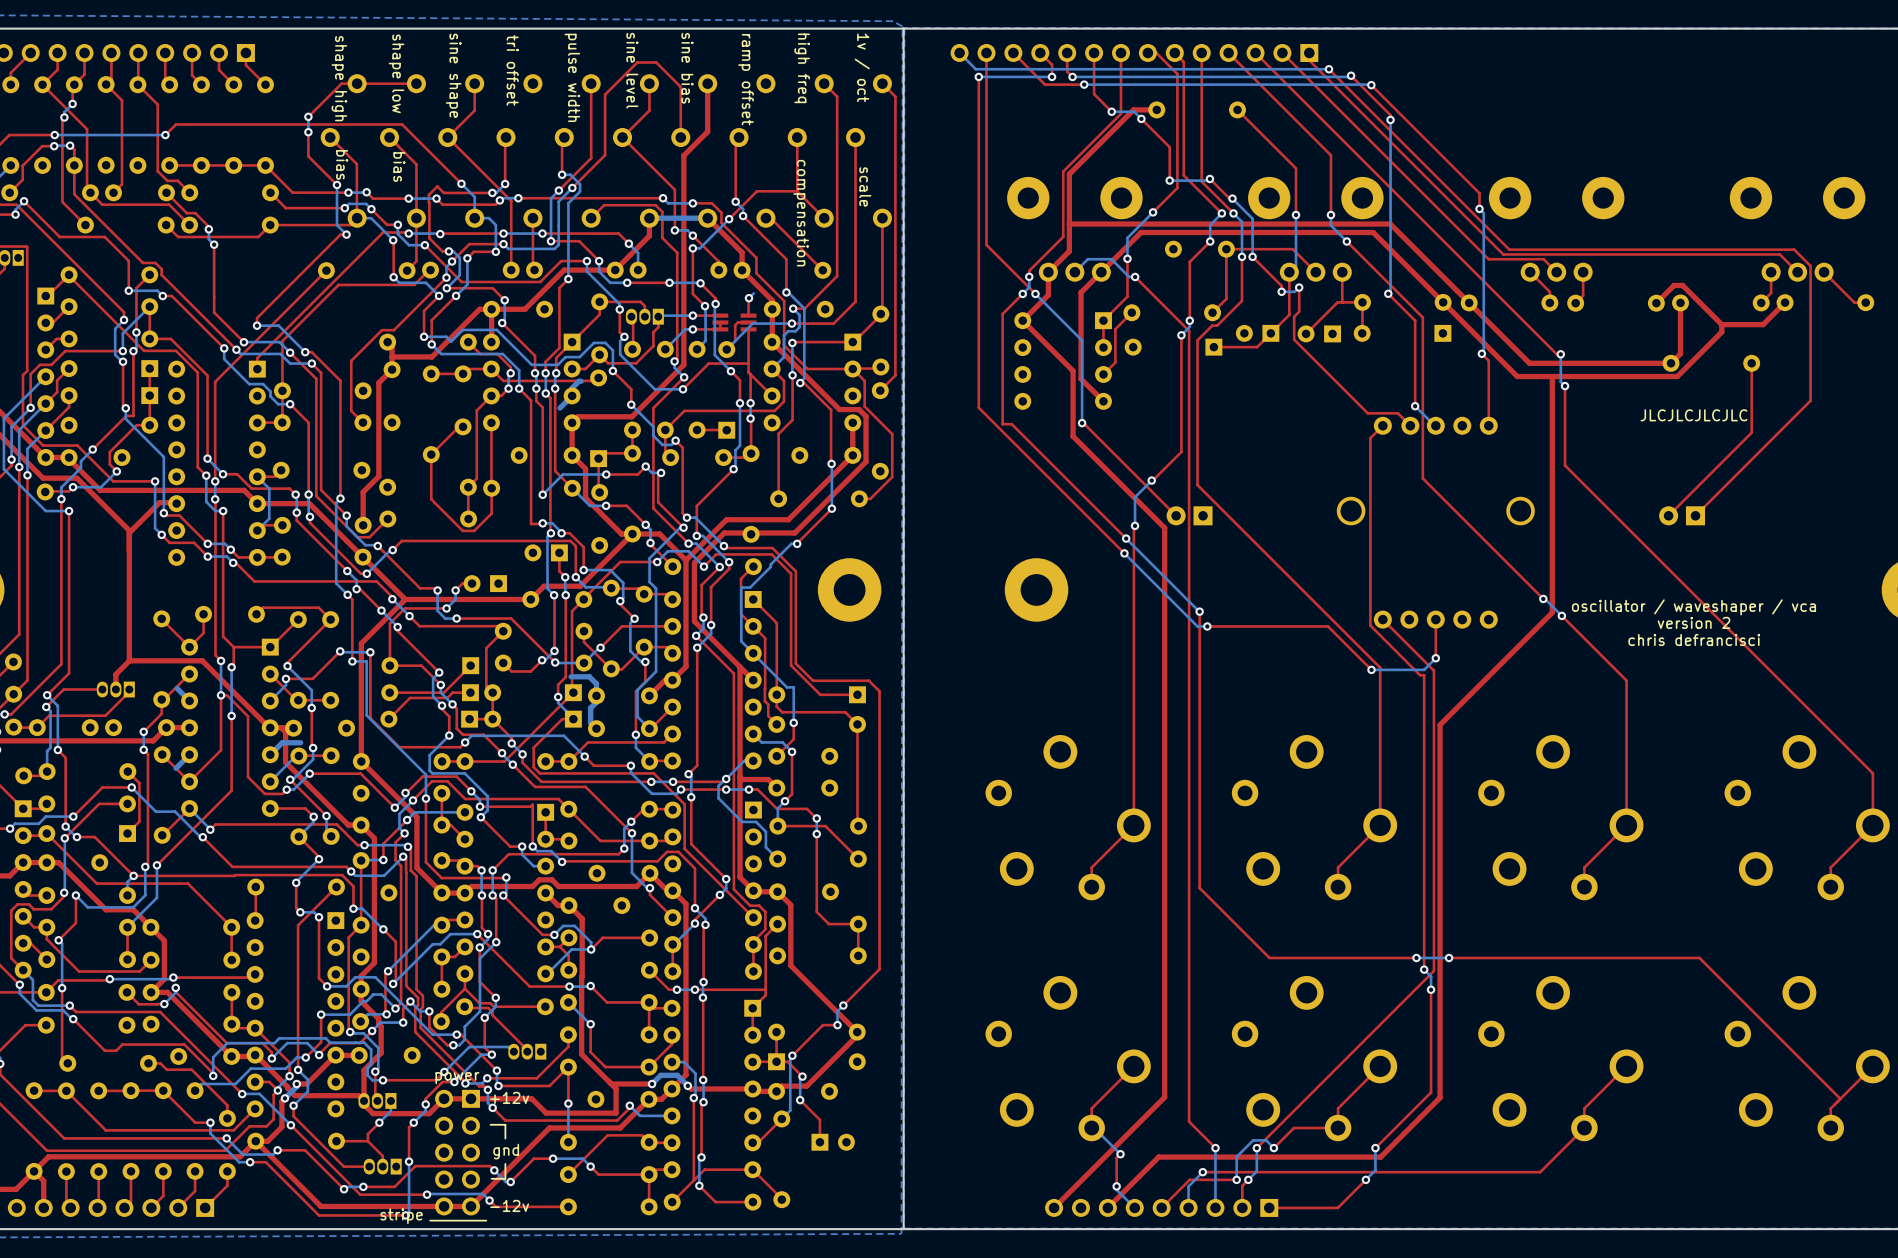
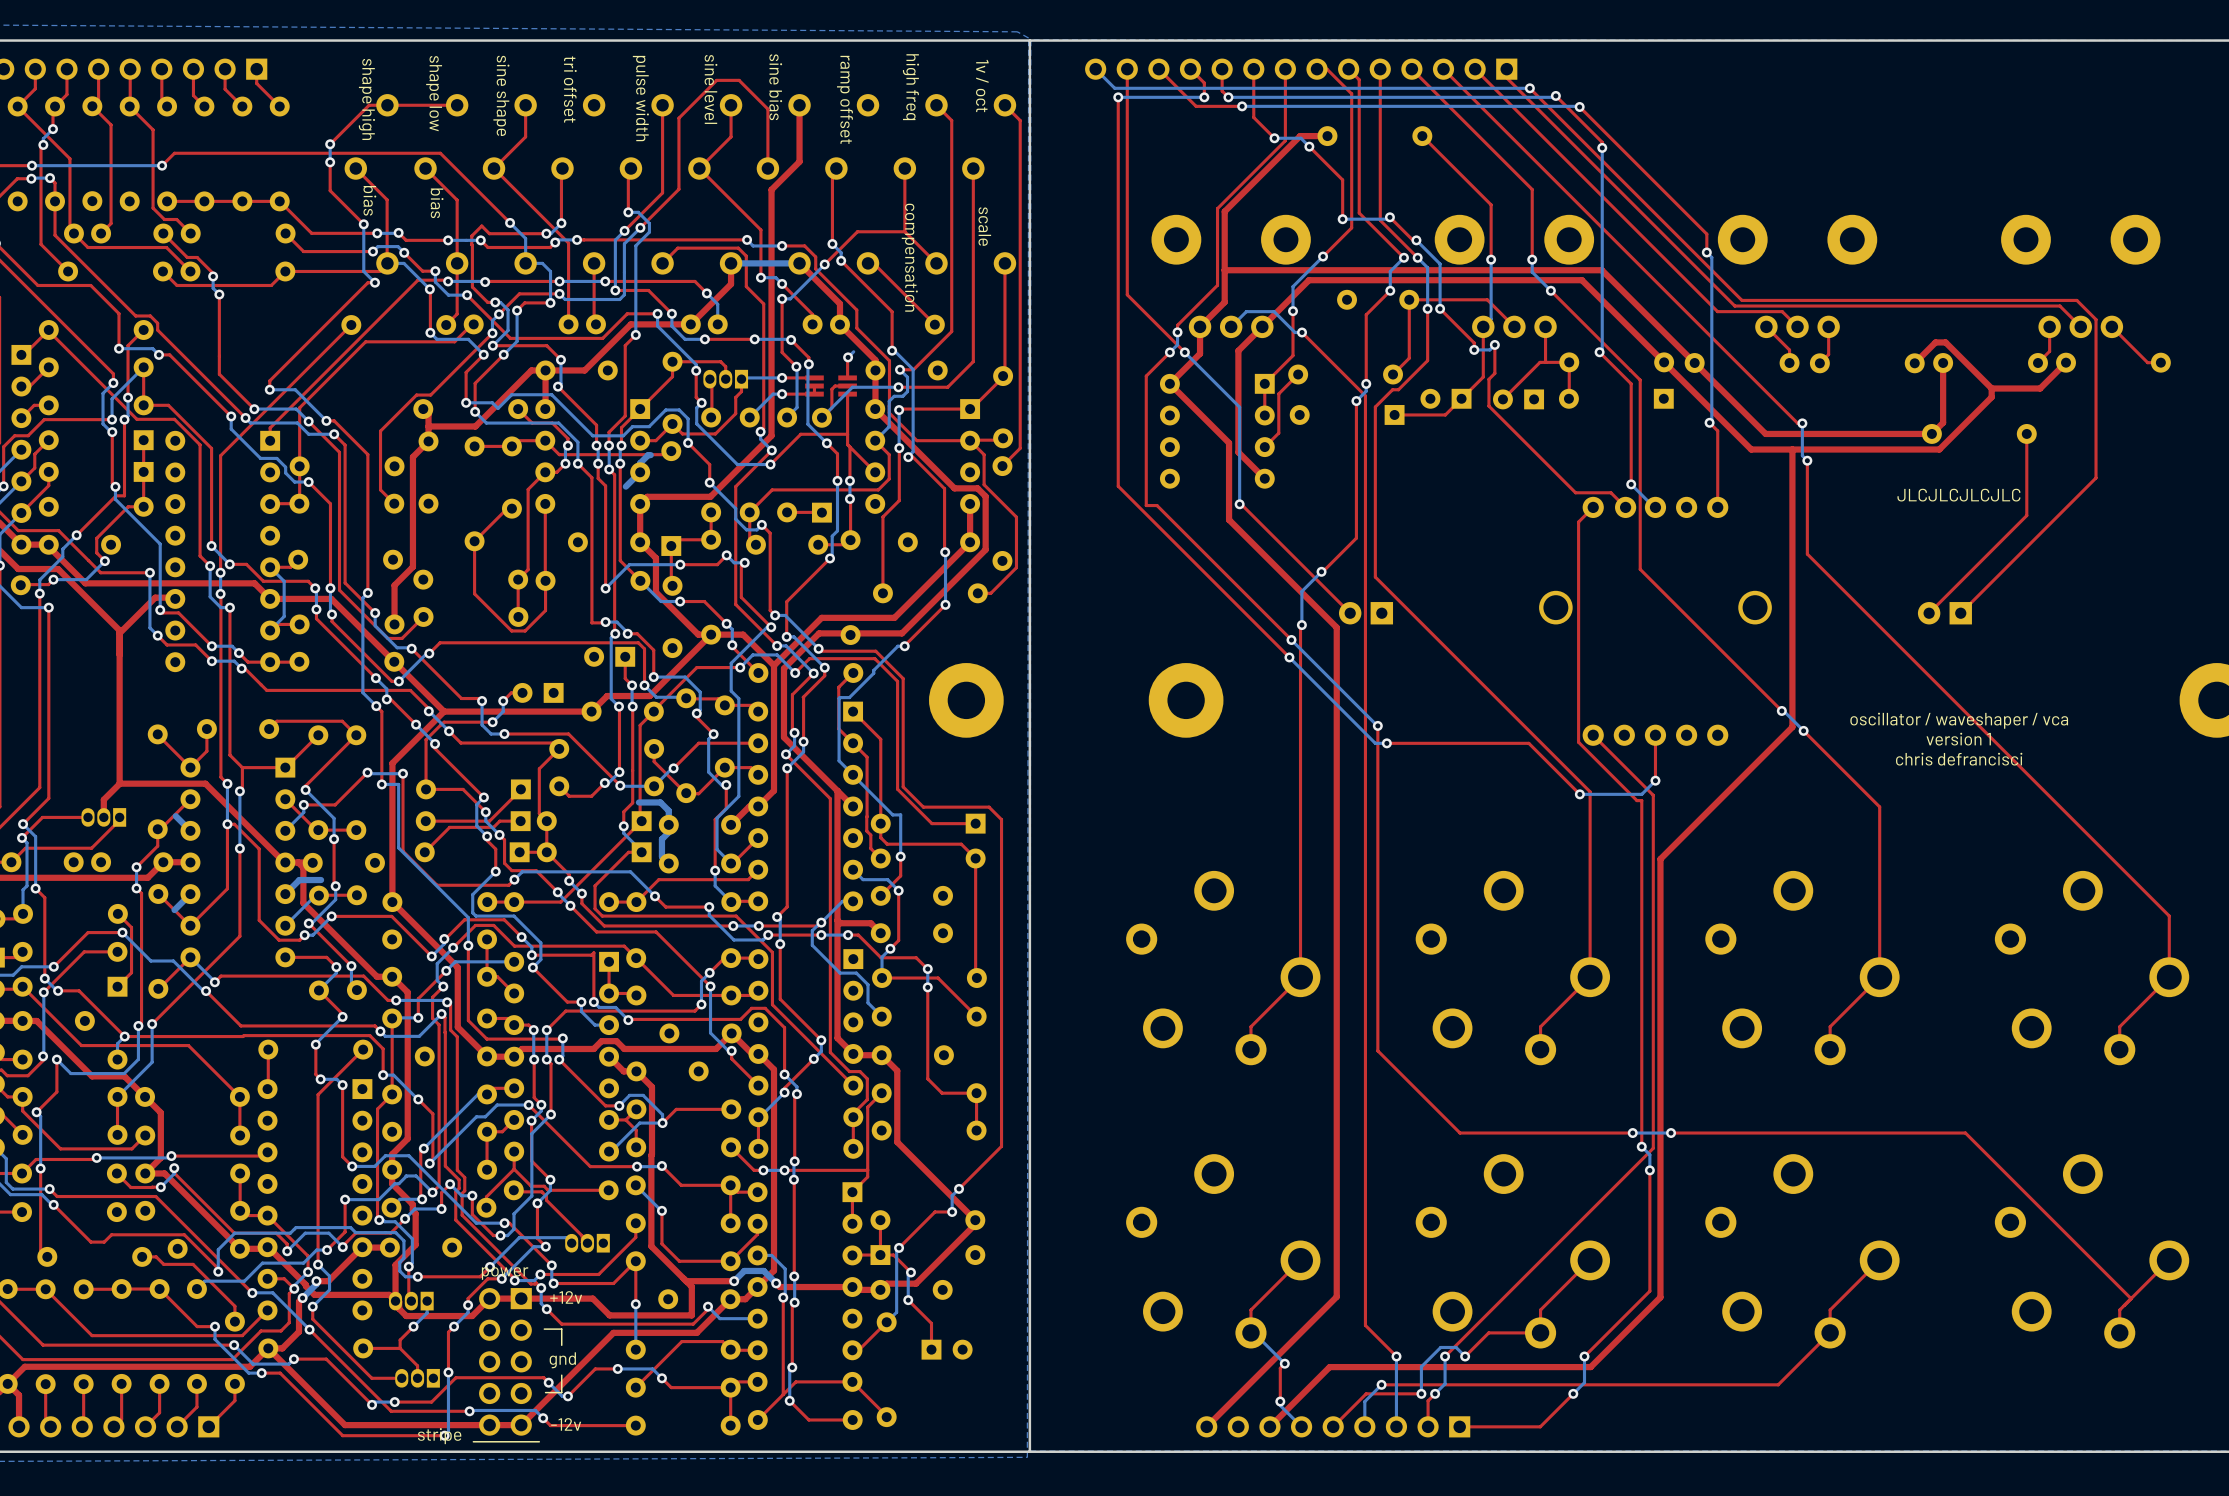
text: version 2 (1693, 622) -> version 1 (1958, 739)

